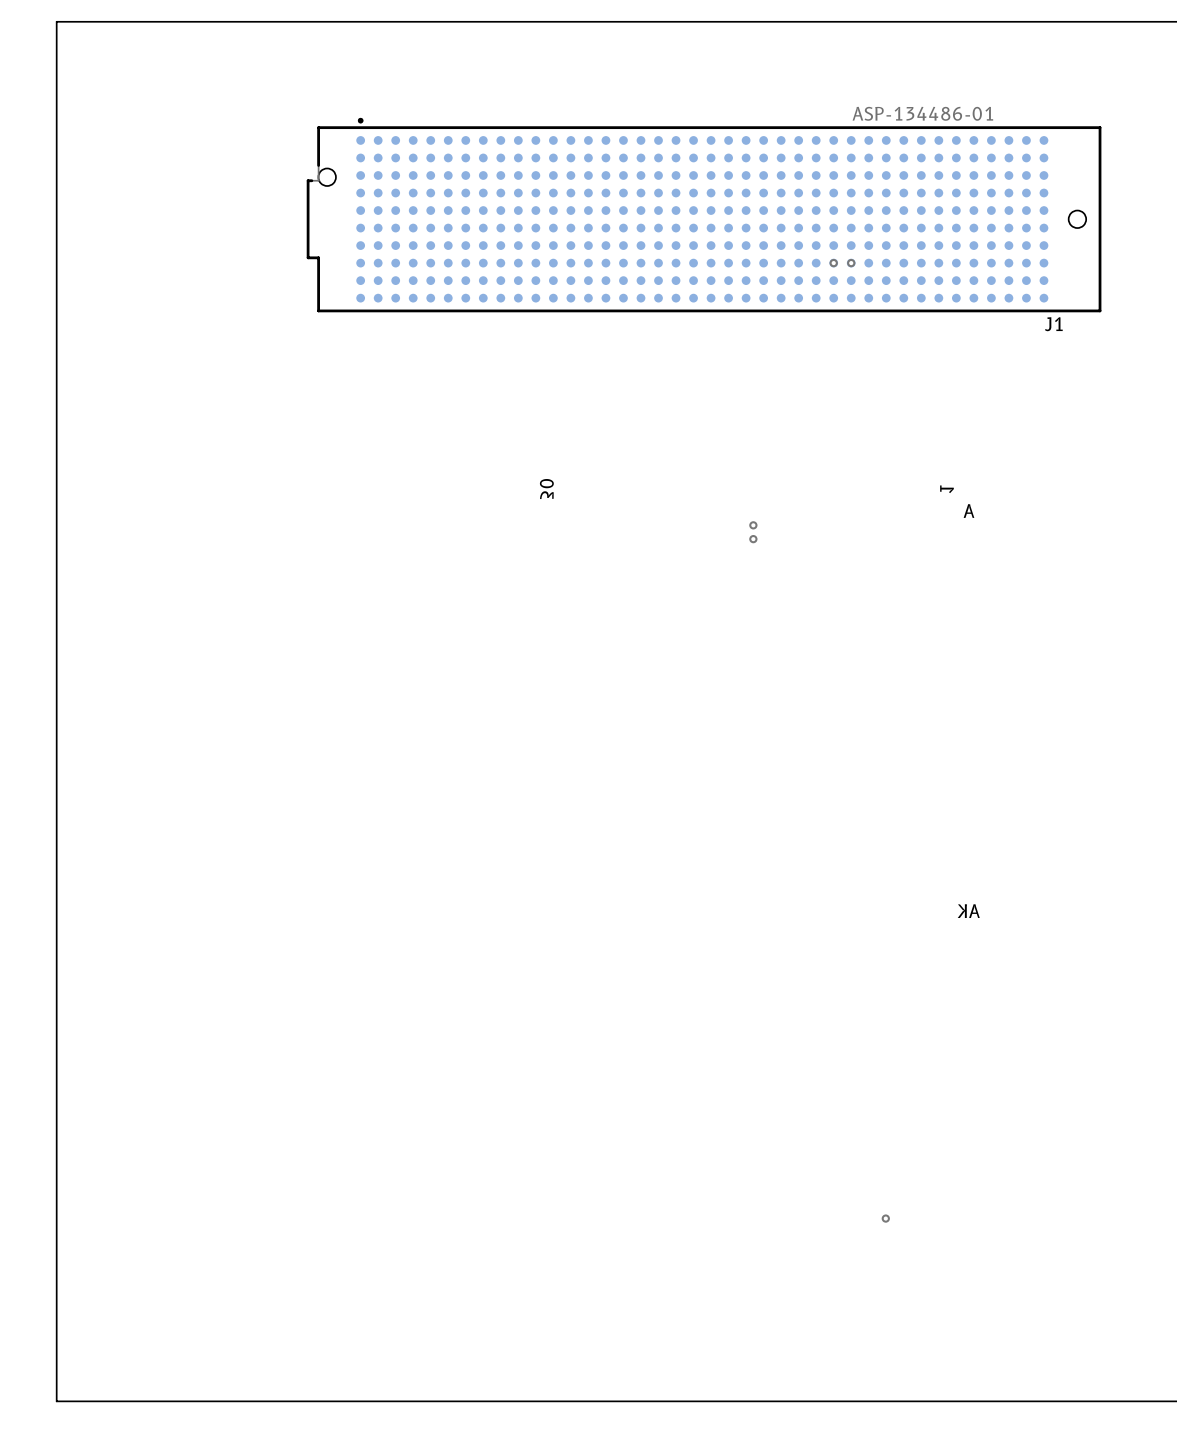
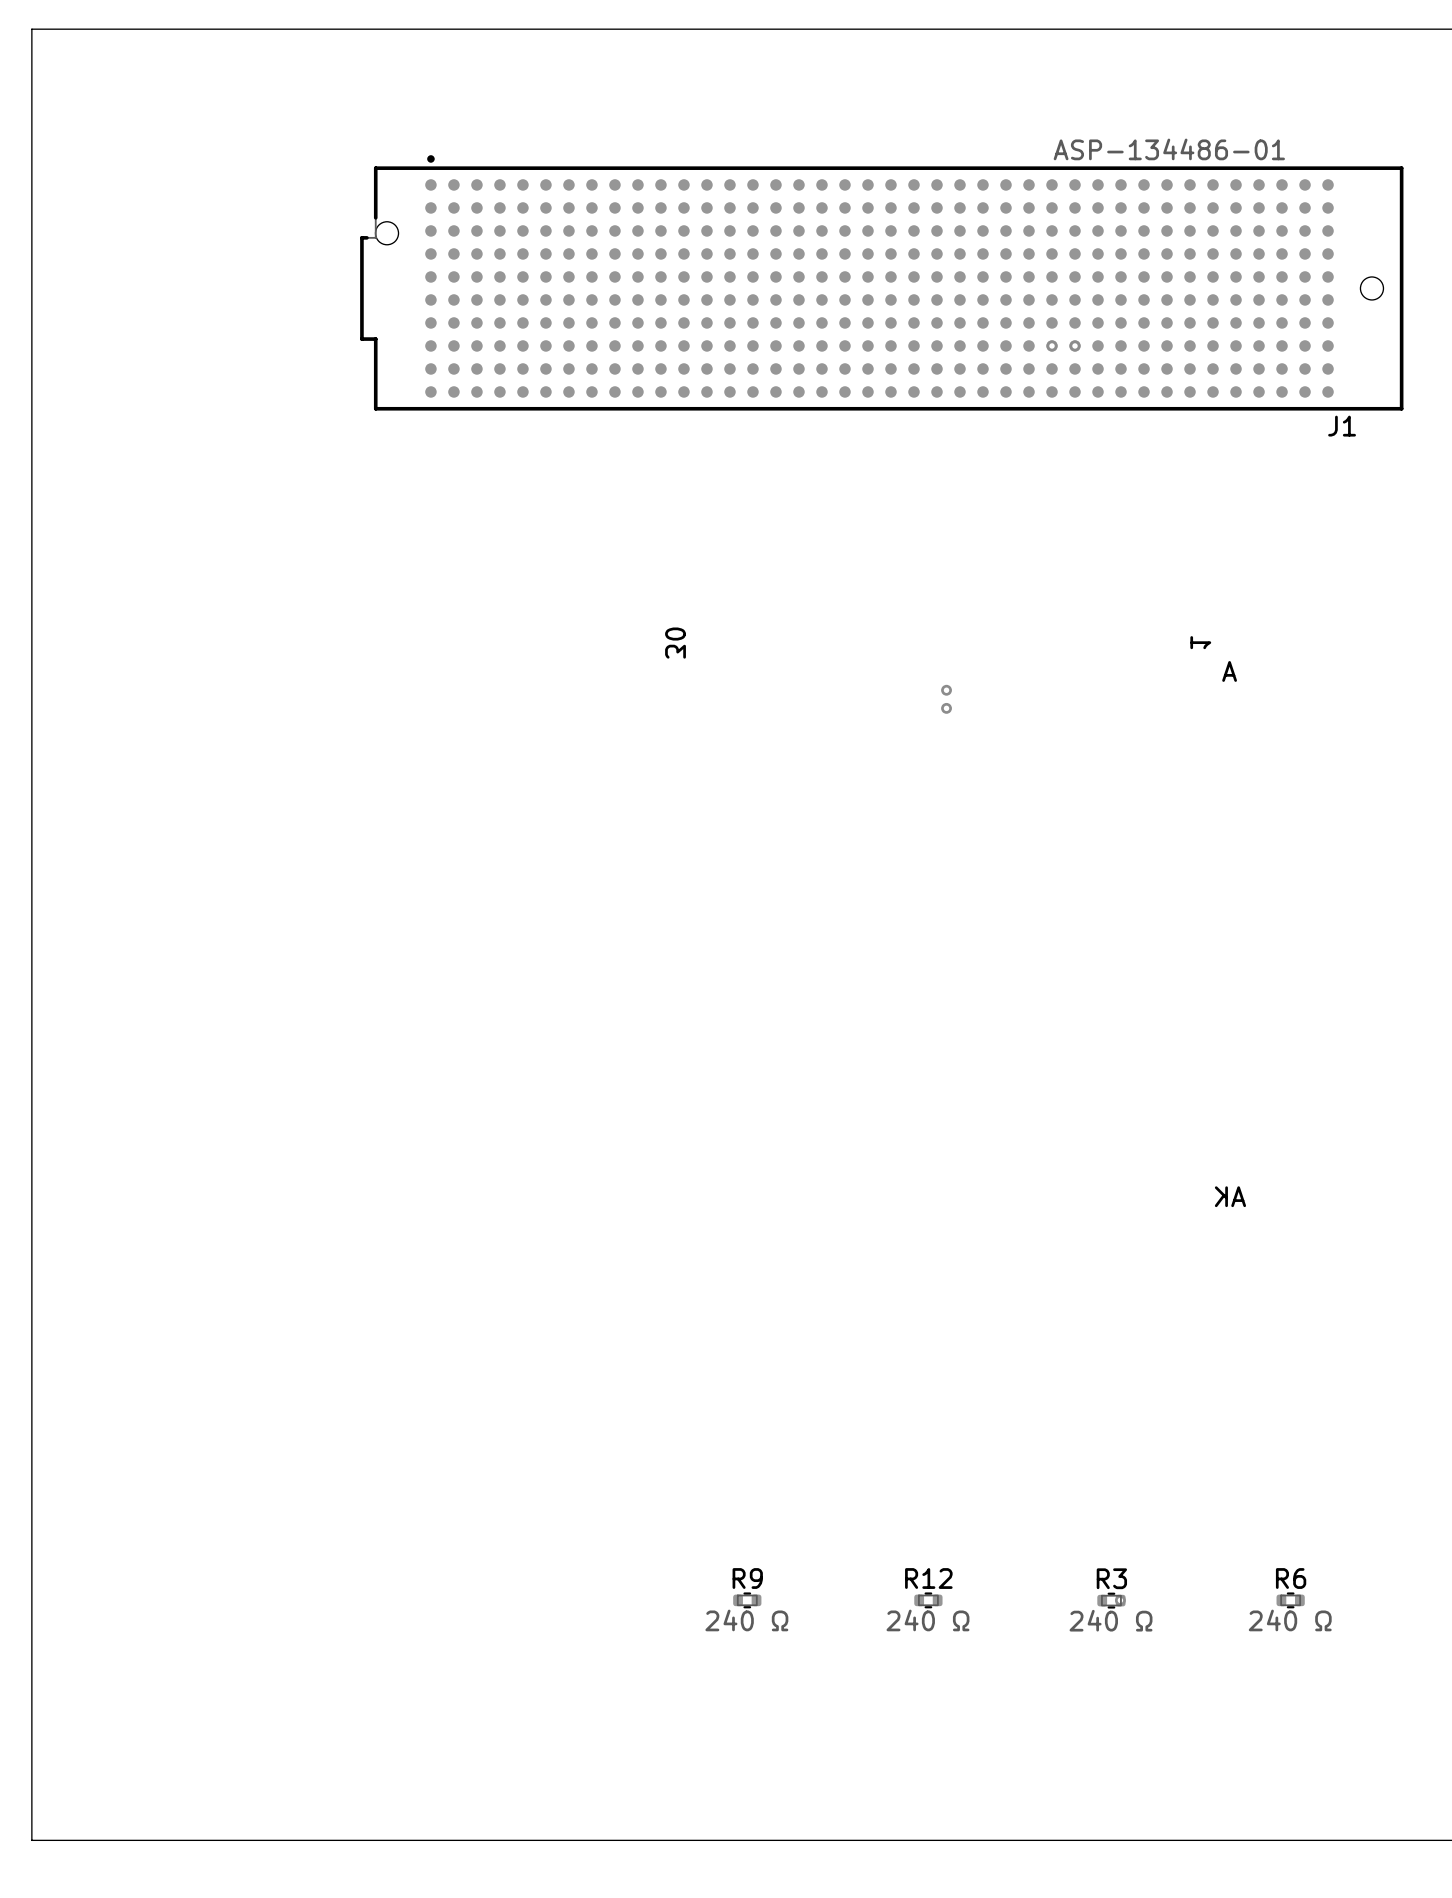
R9: none -> 240 Ω (747, 1600)
R12: none -> 240 Ω (928, 1600)
R3: none -> 240 Ω (1111, 1600)
R6: none -> 240 Ω (1290, 1600)

